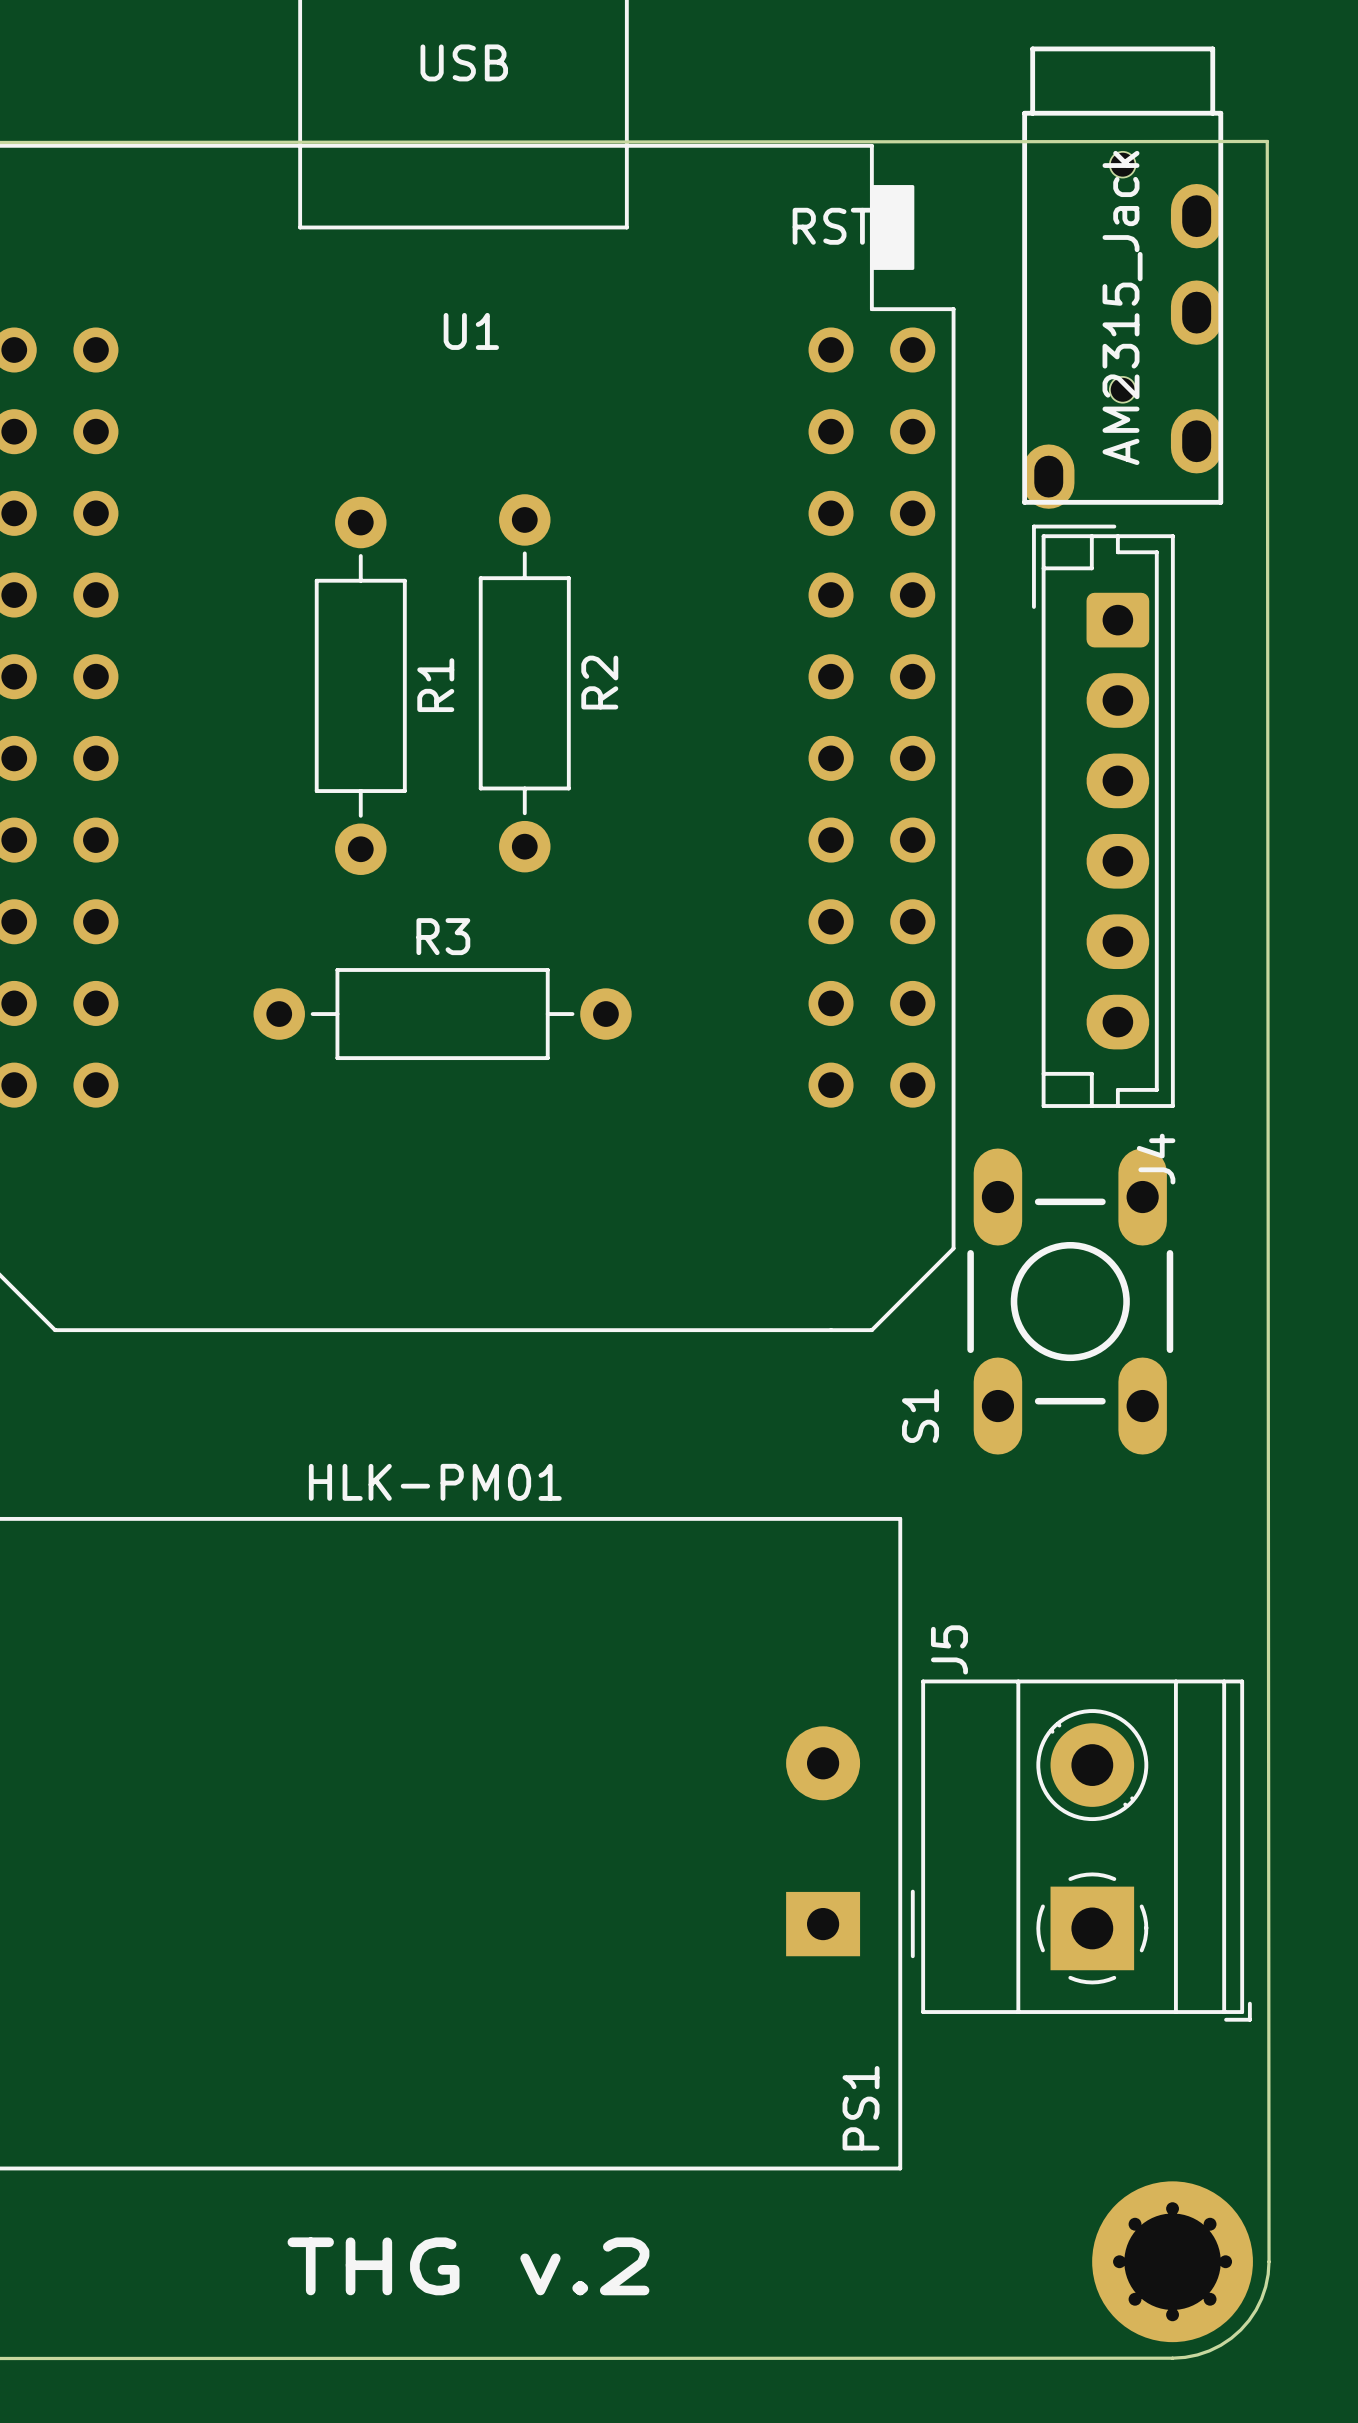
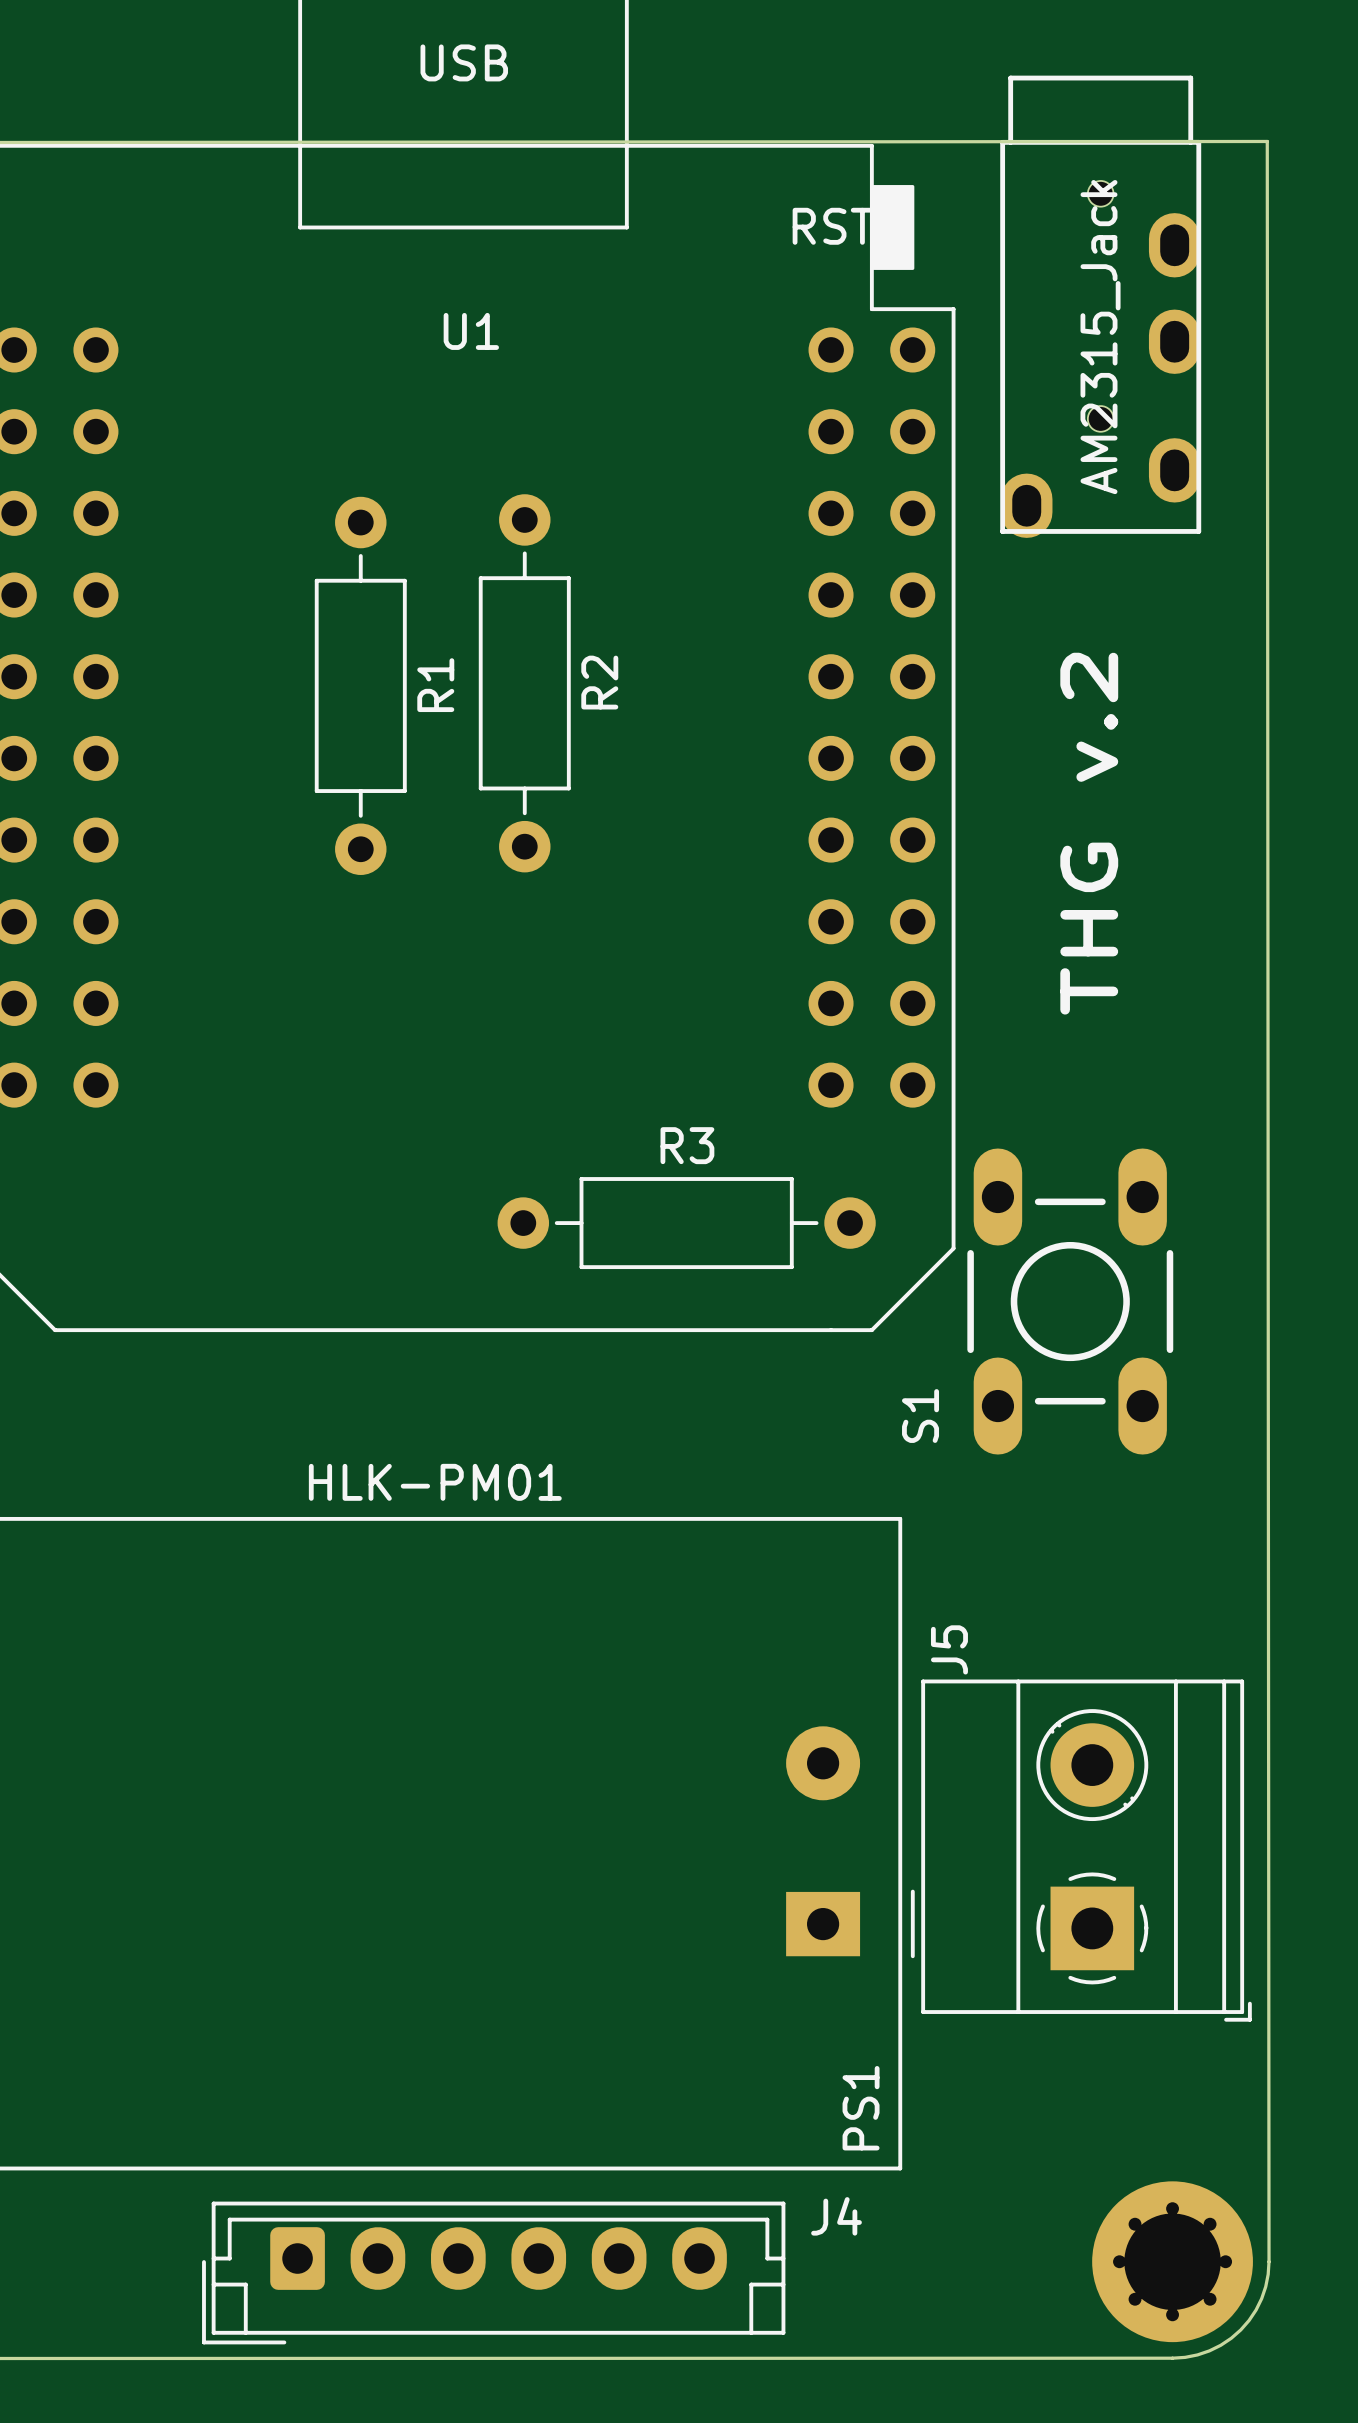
part position: (1122, 277) -> (1100, 306)
J4 rotation: 0° (1103, 816) -> 90° counterclockwise (493, 2272)
J4 position: (1103, 816) -> (493, 2272)
text: none -> THG v.2 (1089, 833)
R3 position: (442, 1014) -> (686, 1223)
text: THG v.2 (468, 2266) -> none

